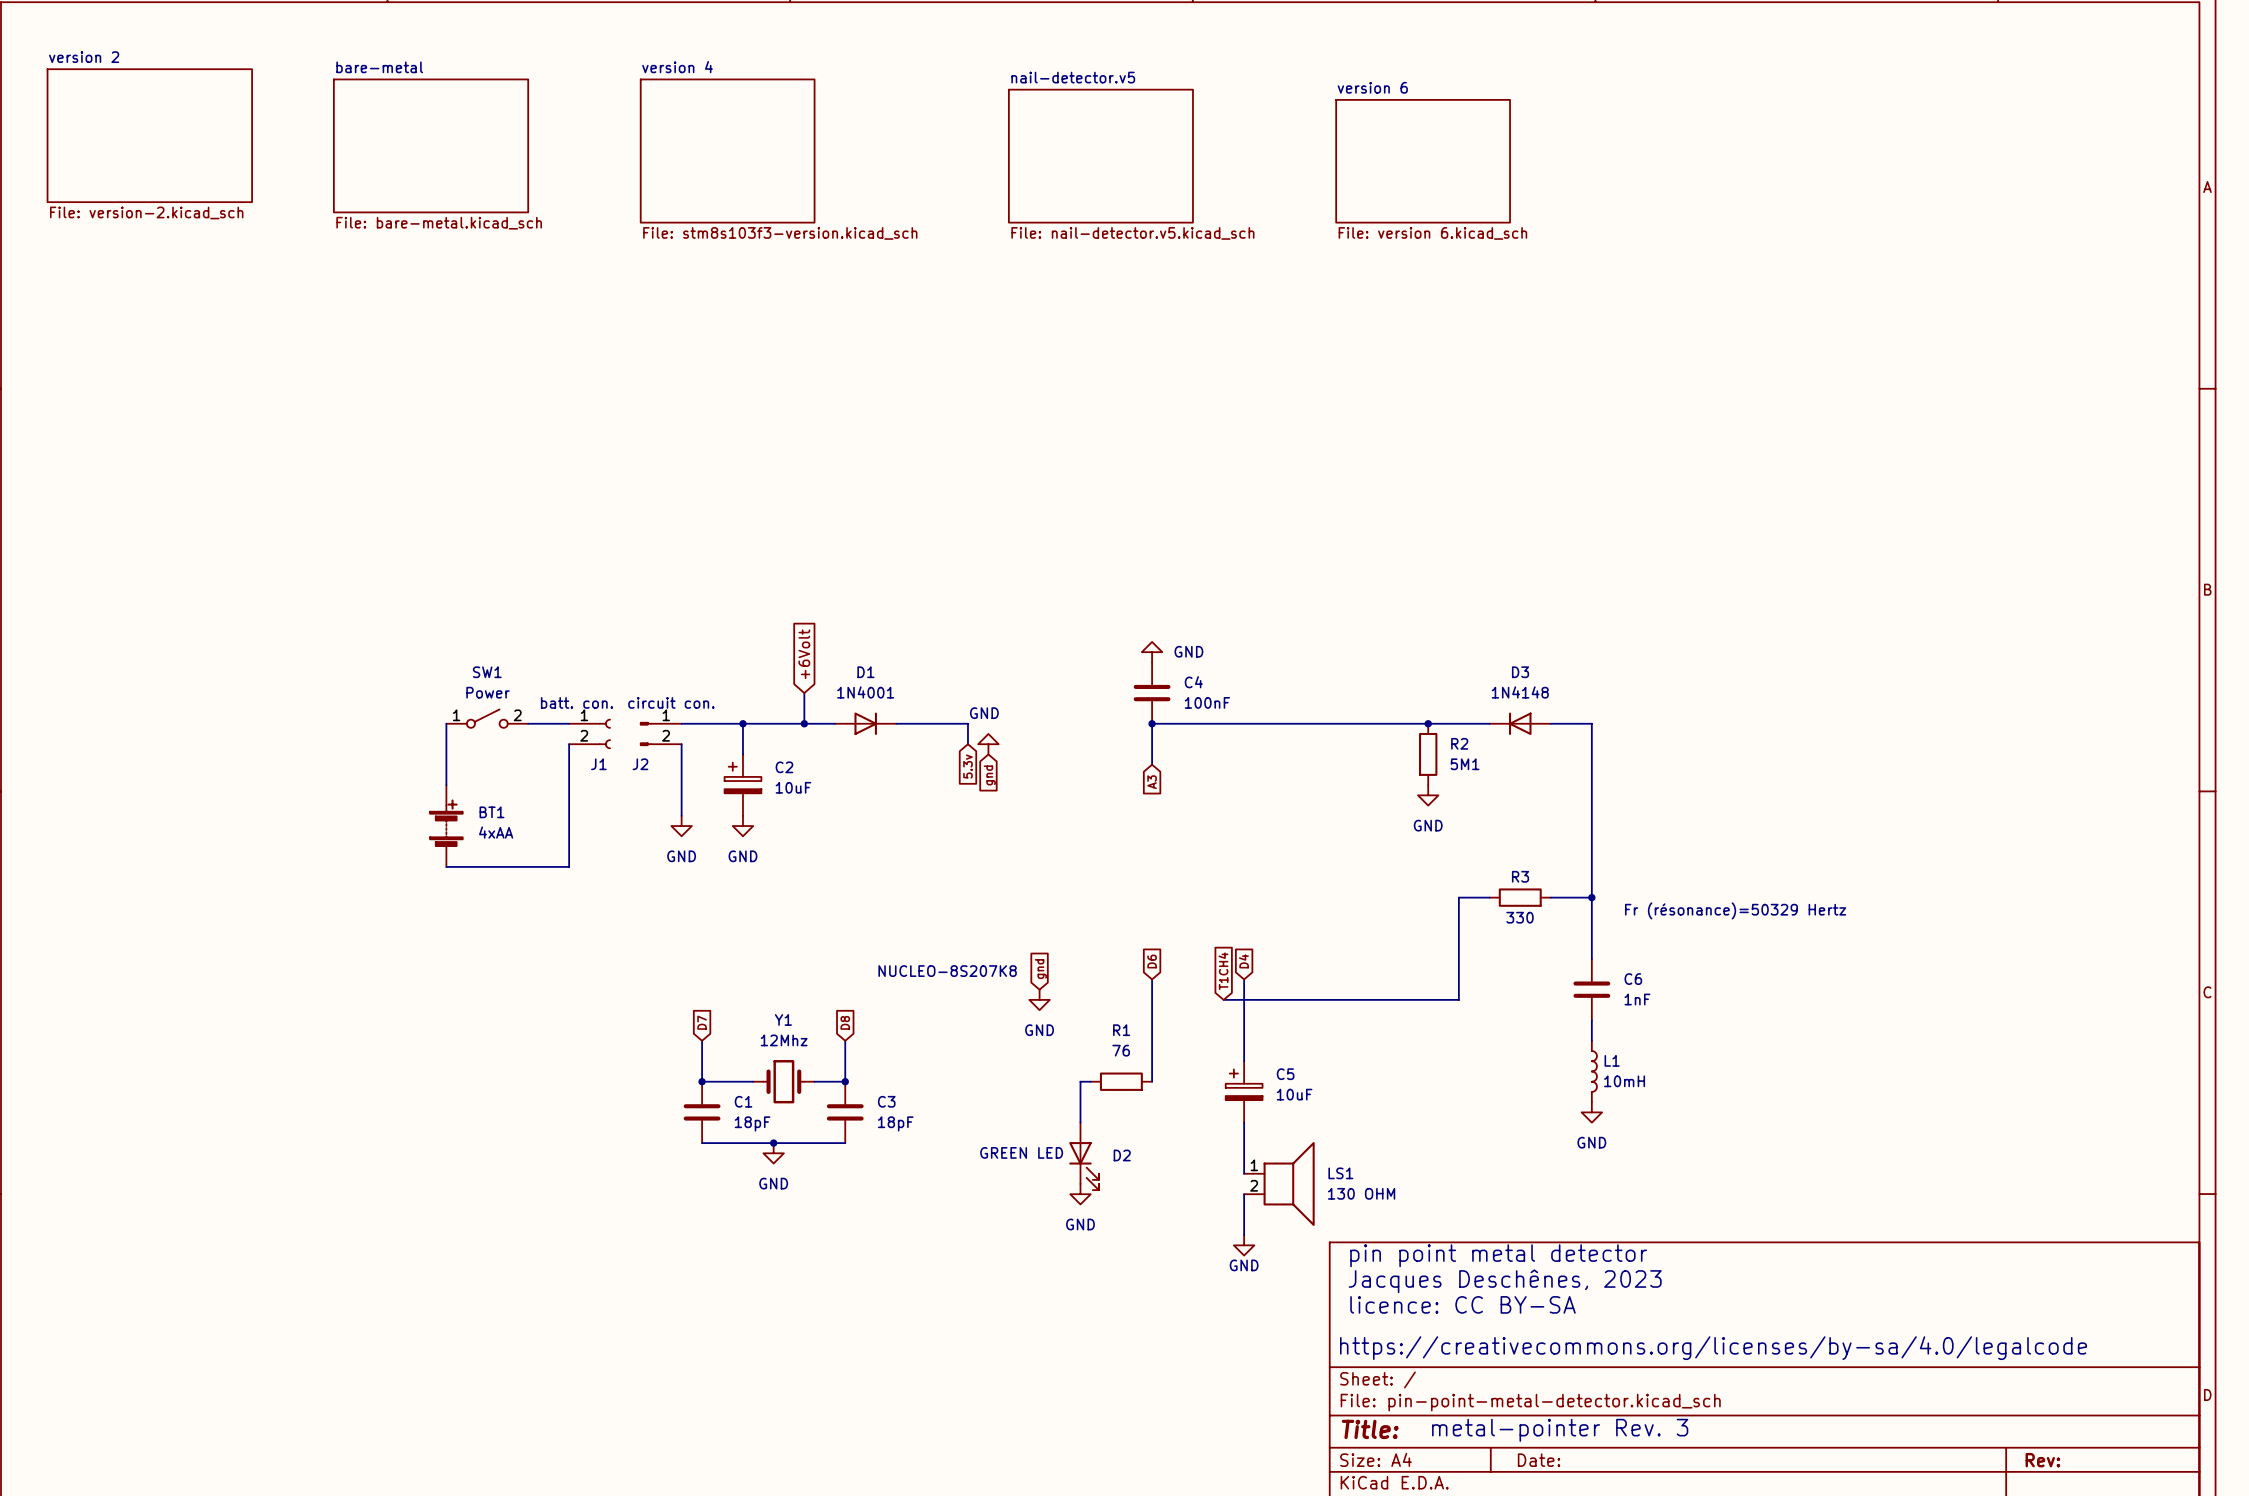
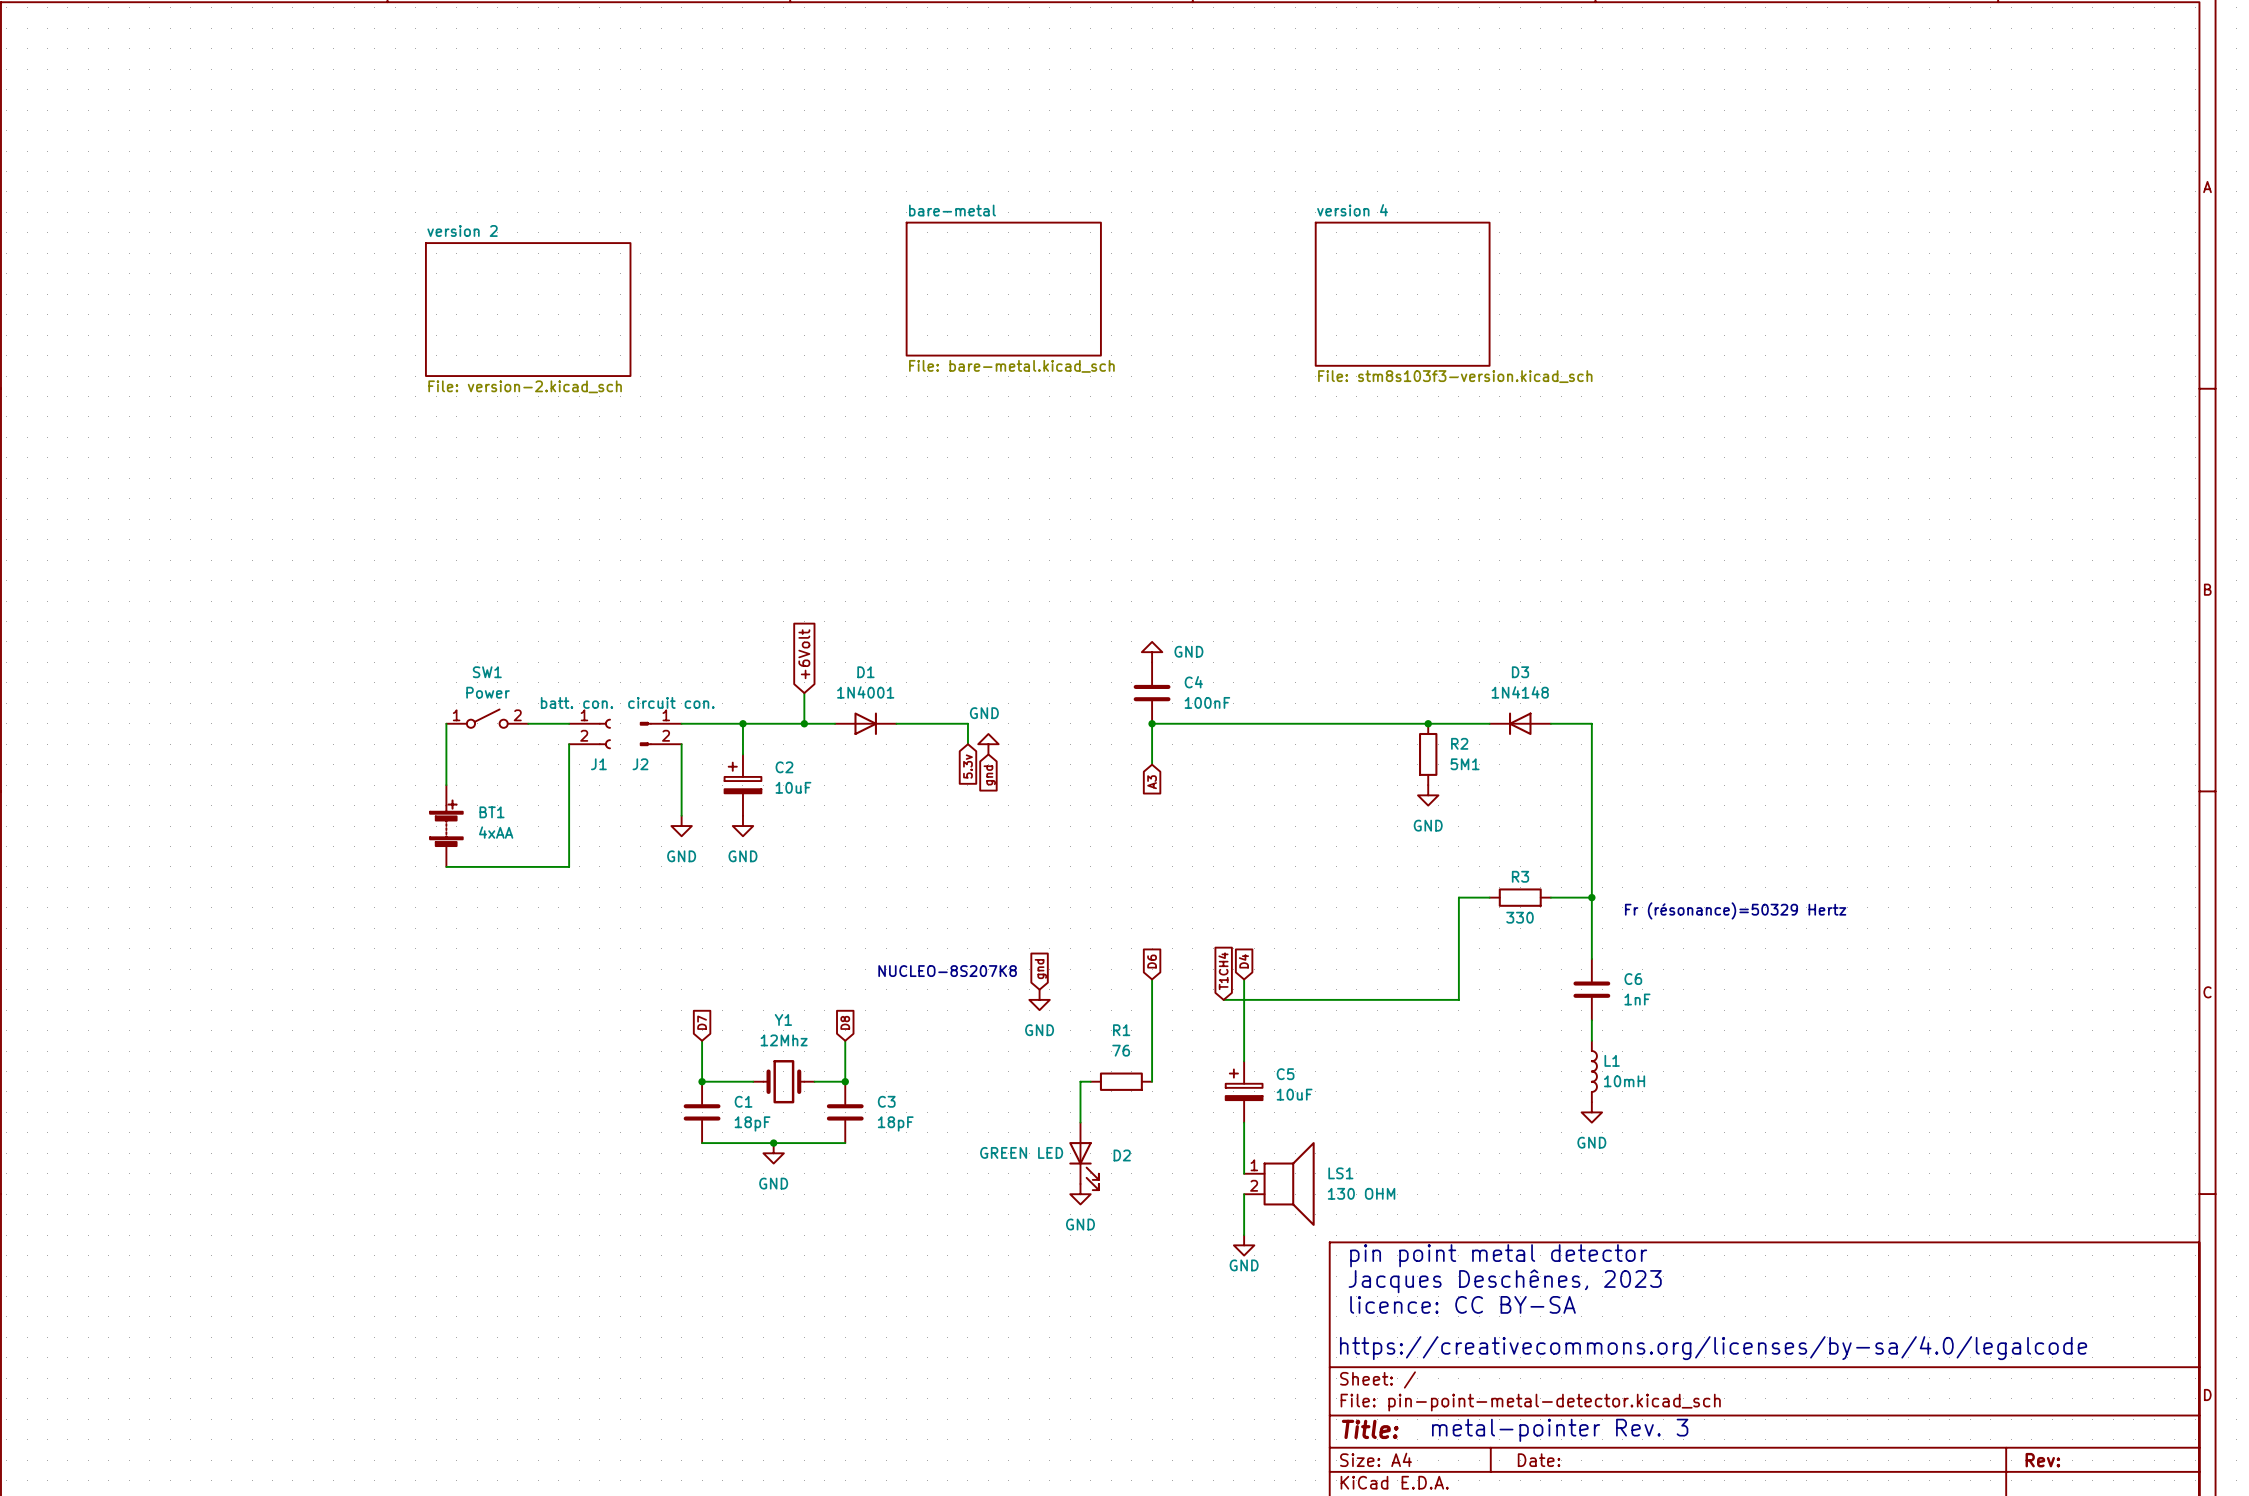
sheet version 2 position: (149, 135) -> (528, 309)
sheet bare-metal: File: bare-metal.kicad_sch (431, 145) -> none
sheet version 4 position: (727, 151) -> (1402, 294)
sheet nail-detector.v5: File: nail-detector.v5.kicad_sch (1100, 156) -> none
sheet version 6: File: version 6.kicad_sch (1423, 161) -> none
sheet bare-metal: none -> File: bare-metal.kicad_sch (1003, 289)

